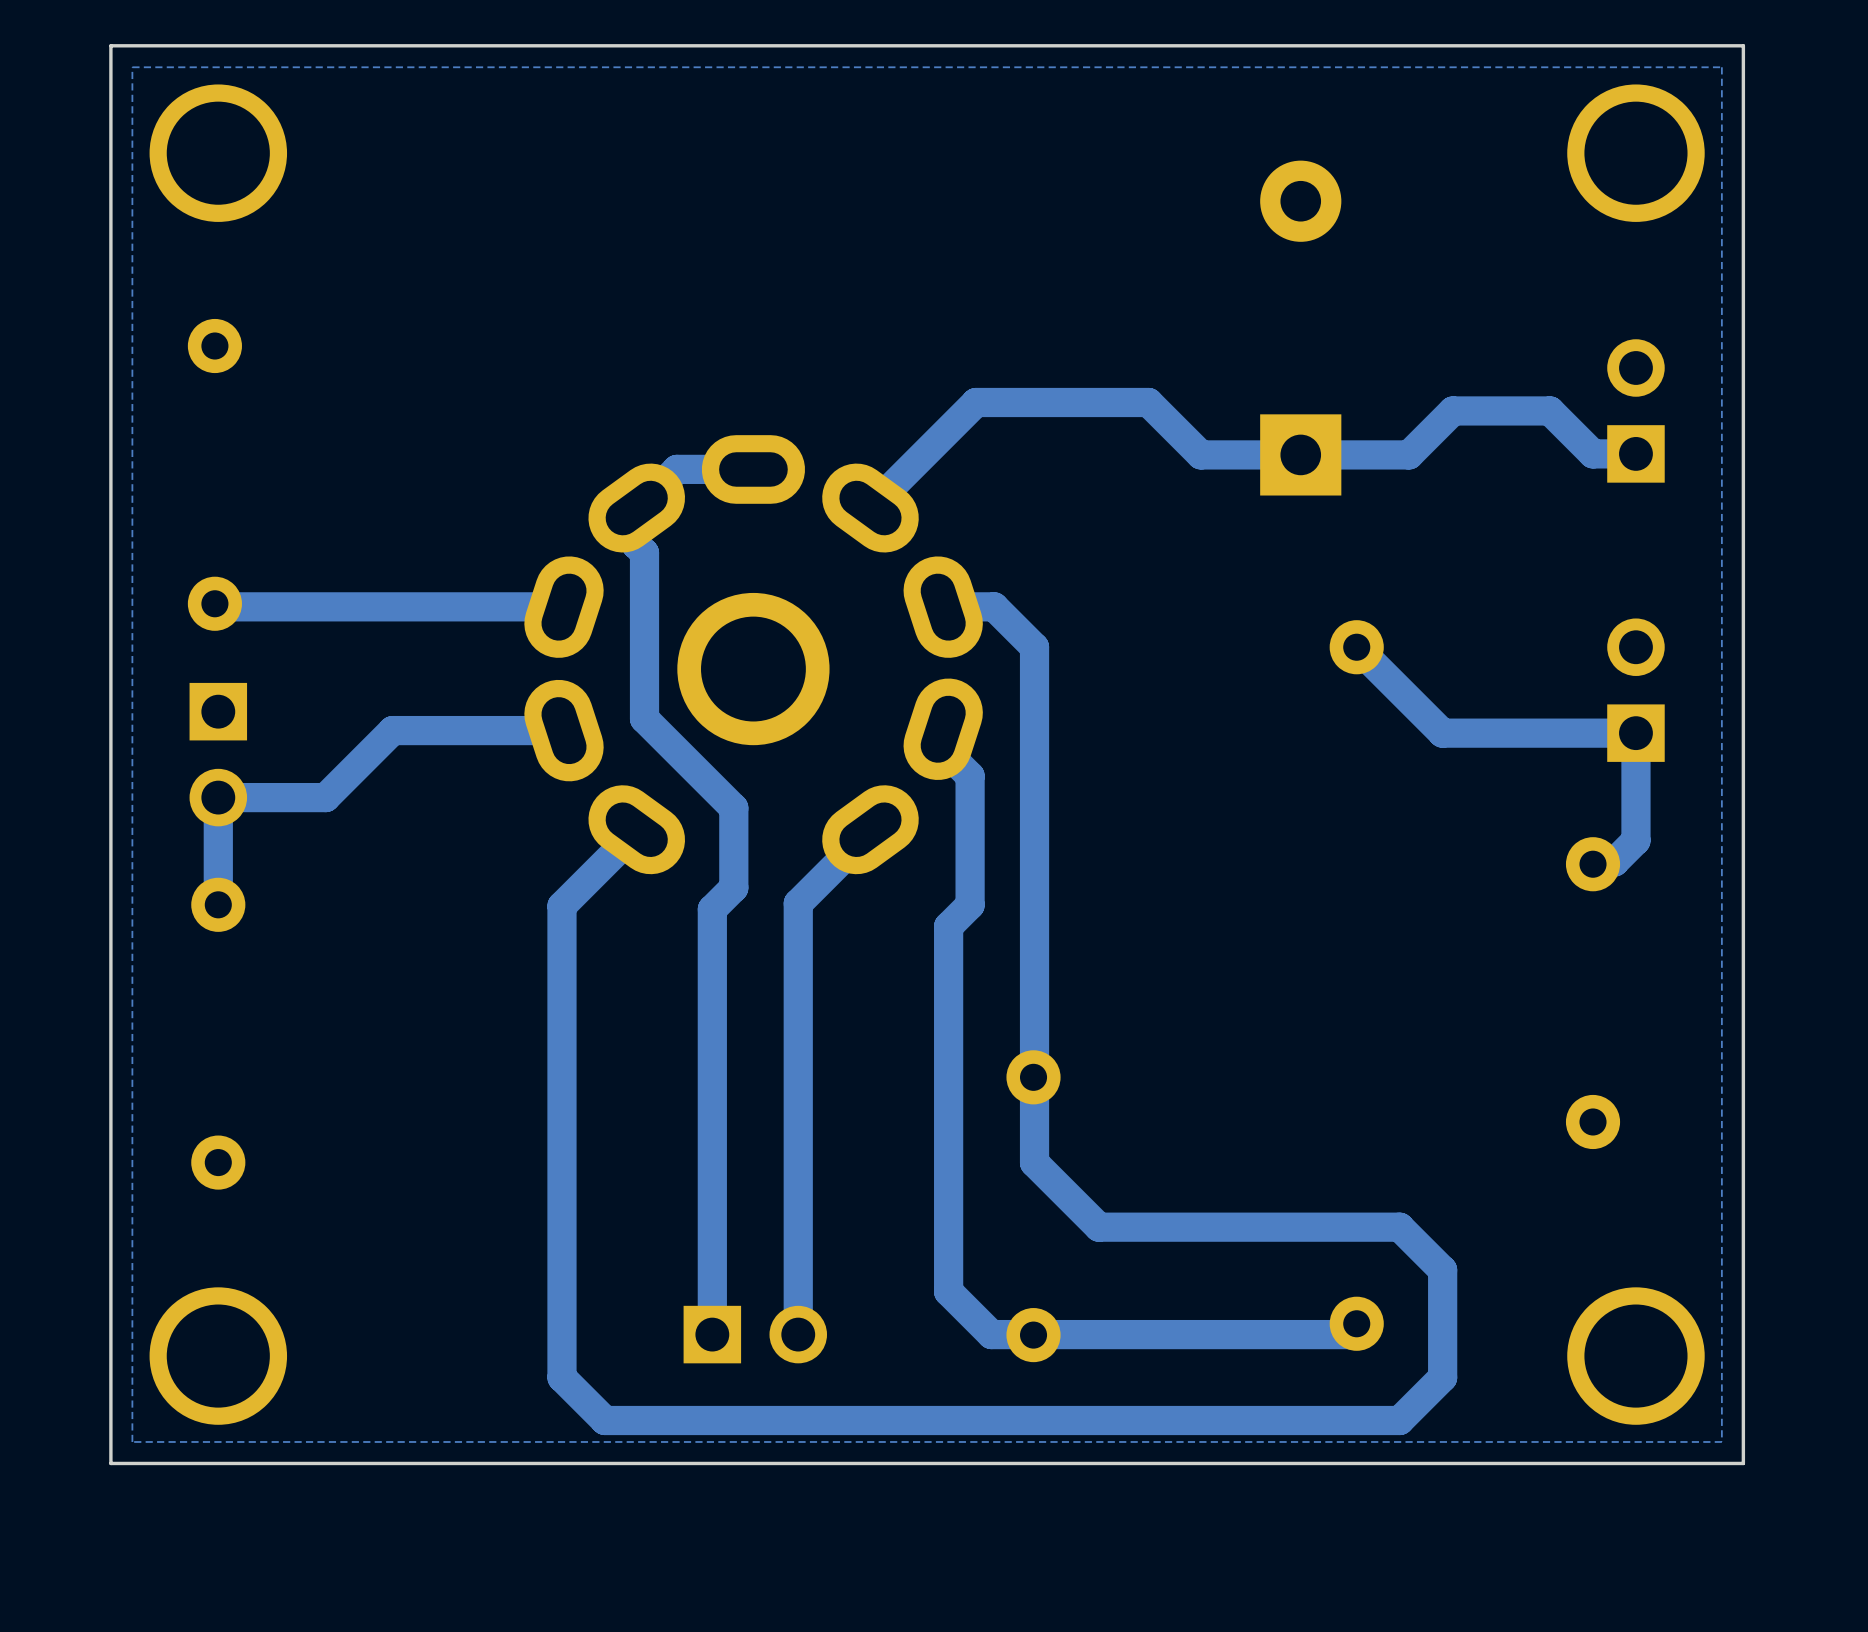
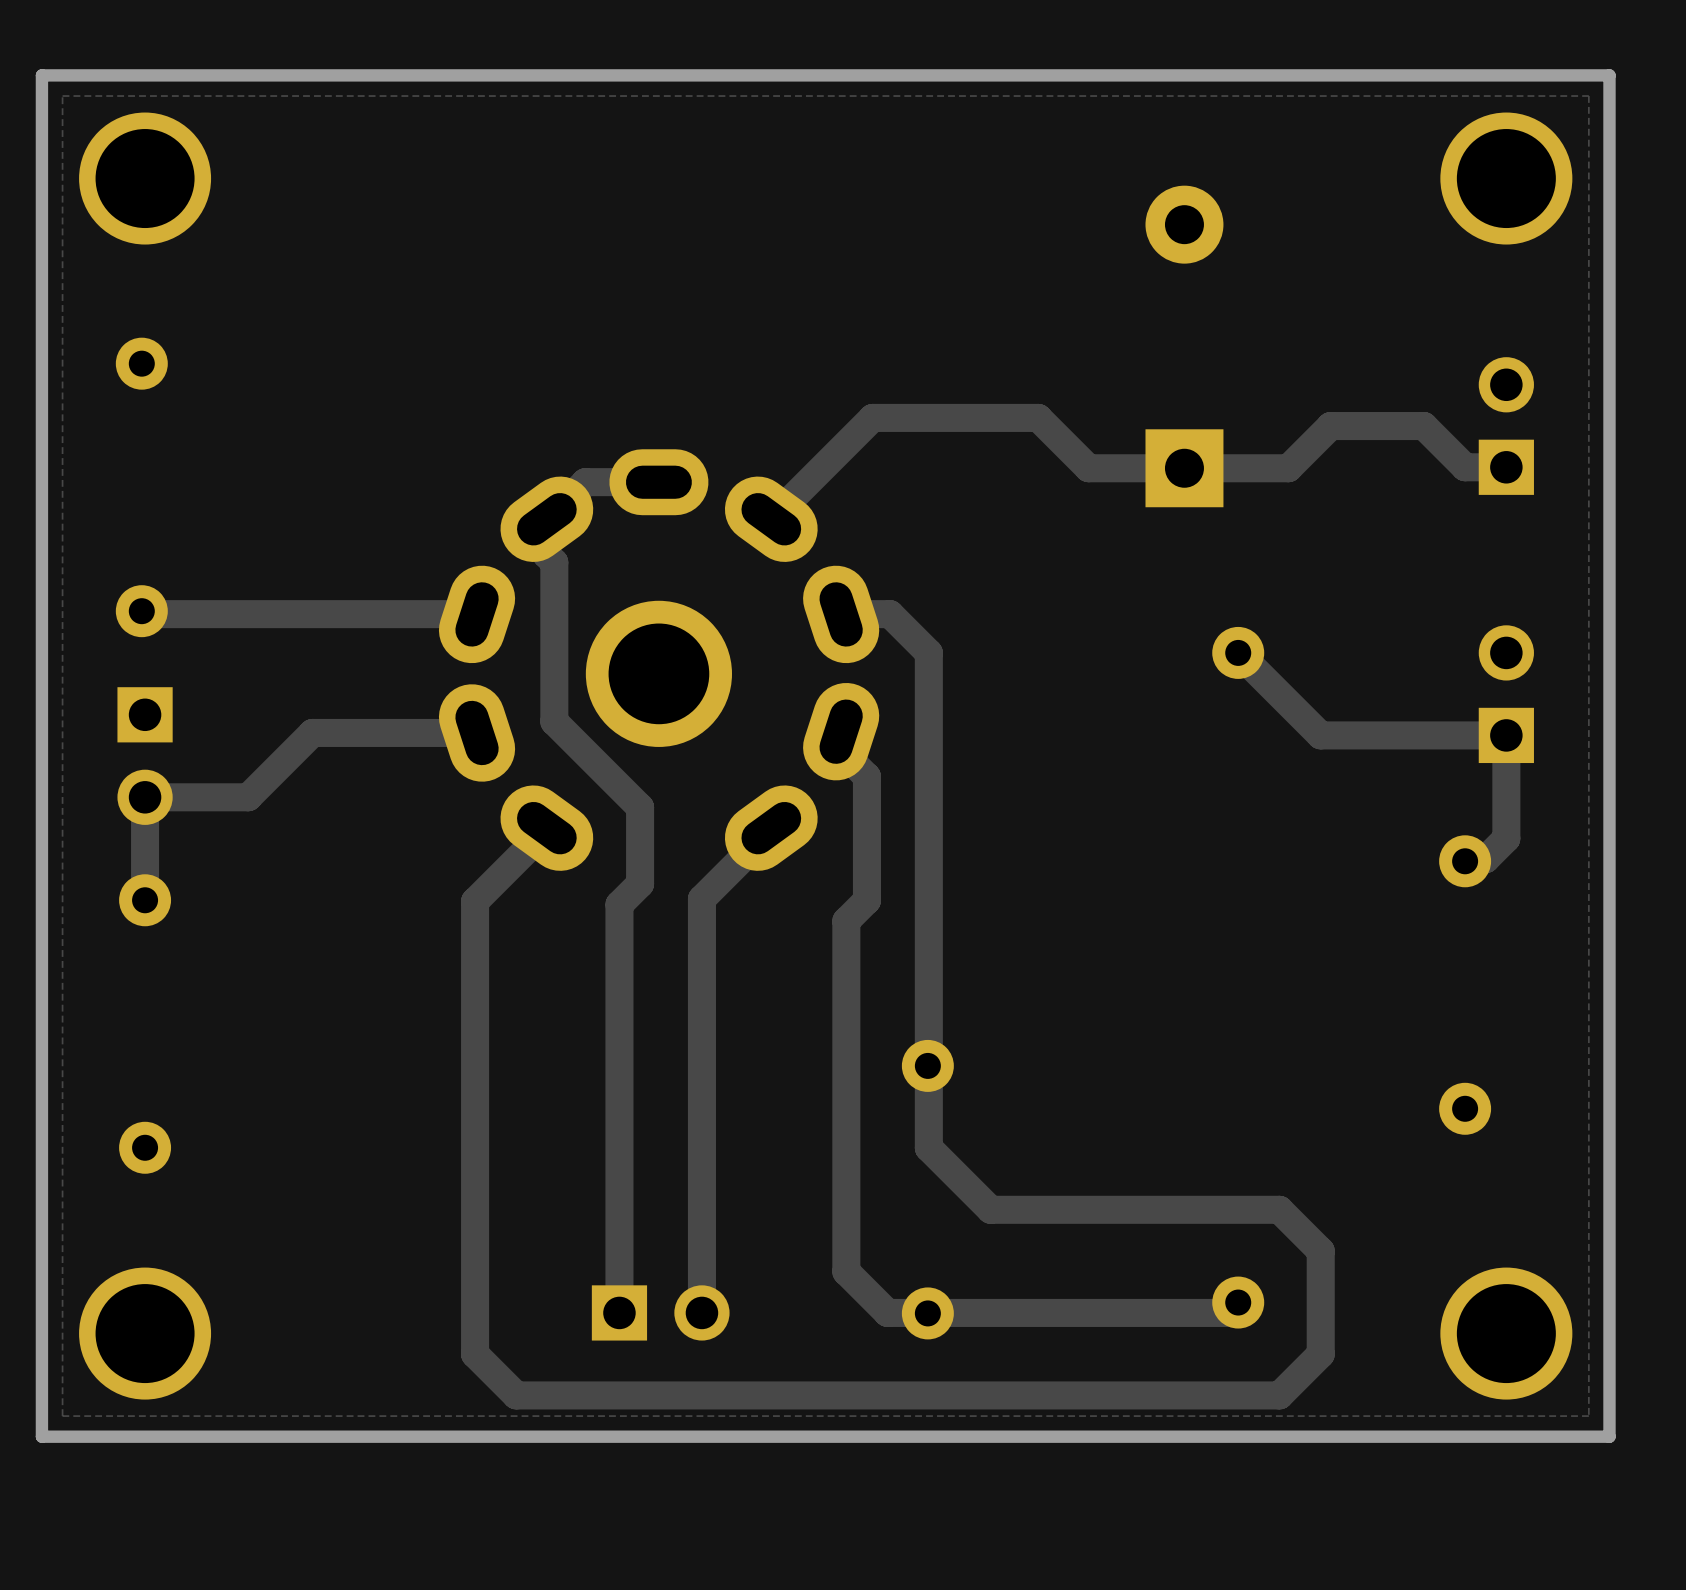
board edge width: thin (1743, 45) (1743, 1463) (110, 1463) (110, 45) (1743, 45) -> thick (1609, 75) (1609, 1436) (41, 1436) (41, 75) (1609, 75)

